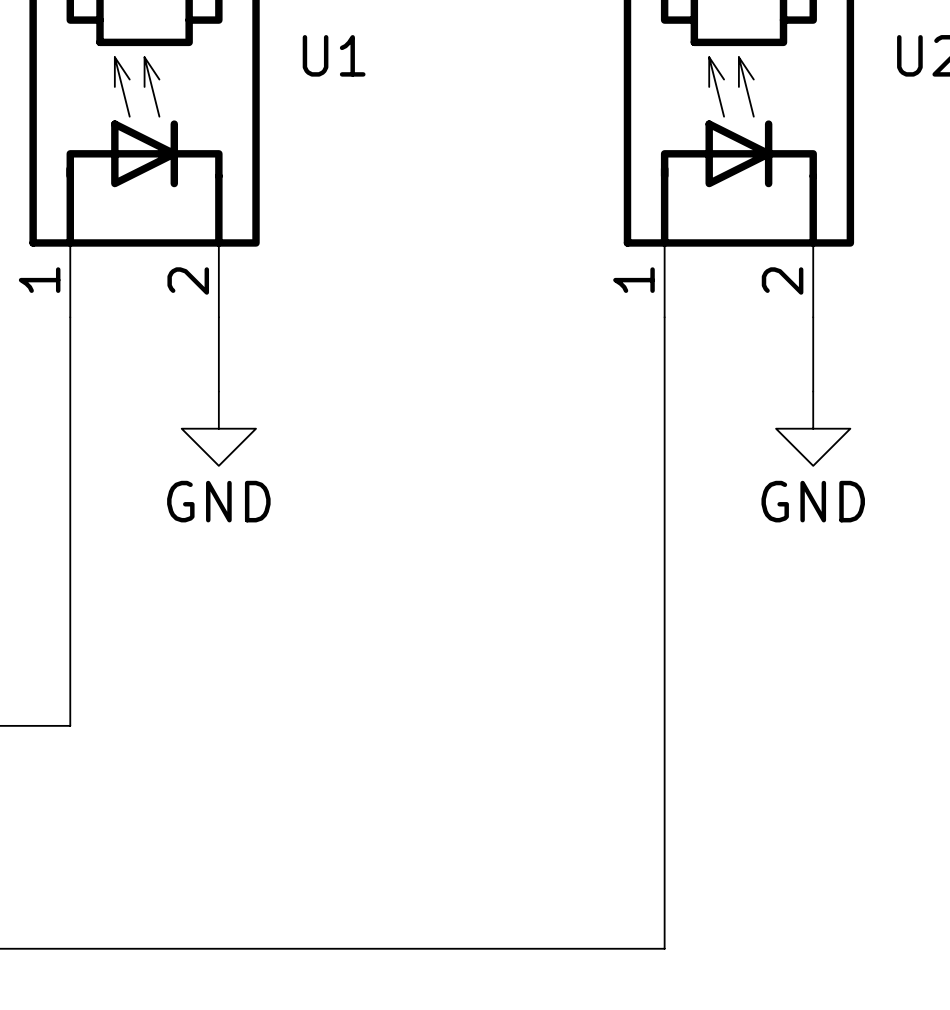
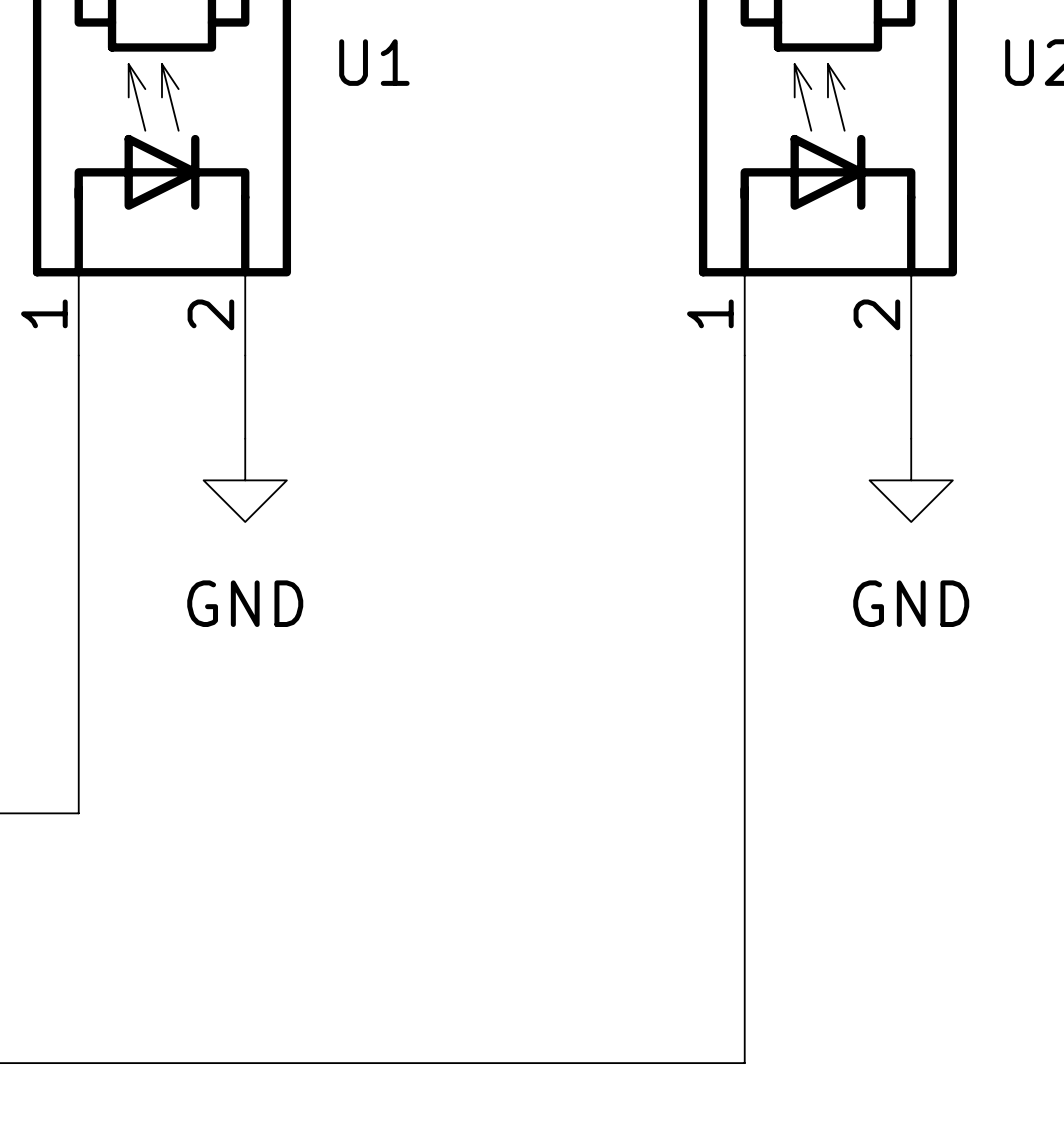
power symbol text position: GND (218, 501) -> GND (245, 603)
power symbol text position: GND (813, 501) -> GND (911, 603)

